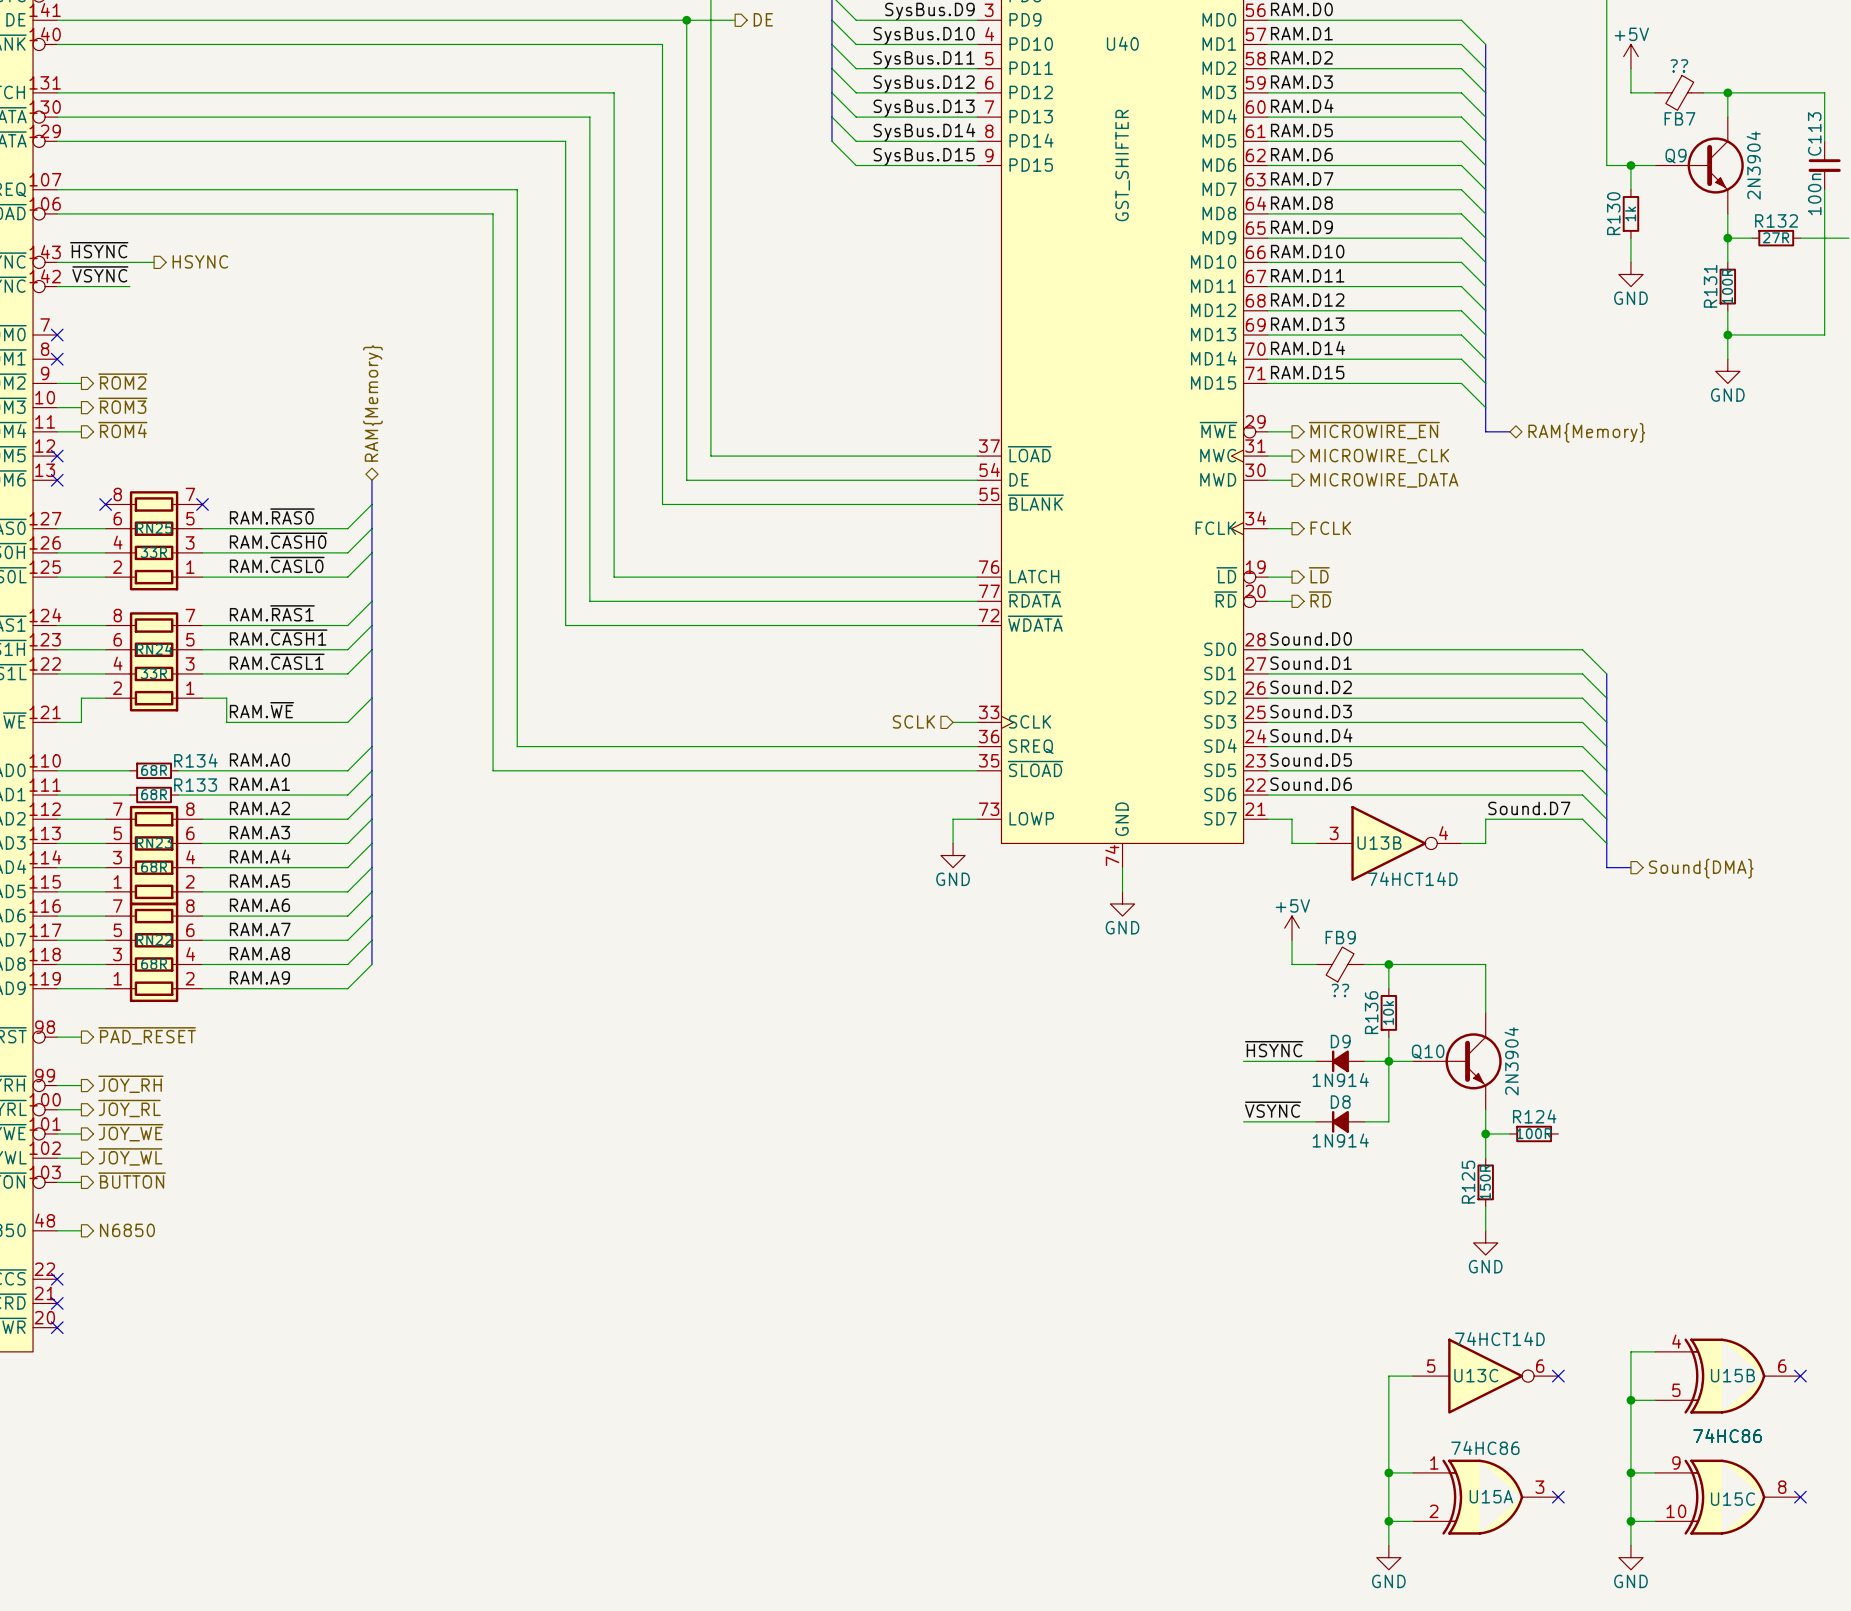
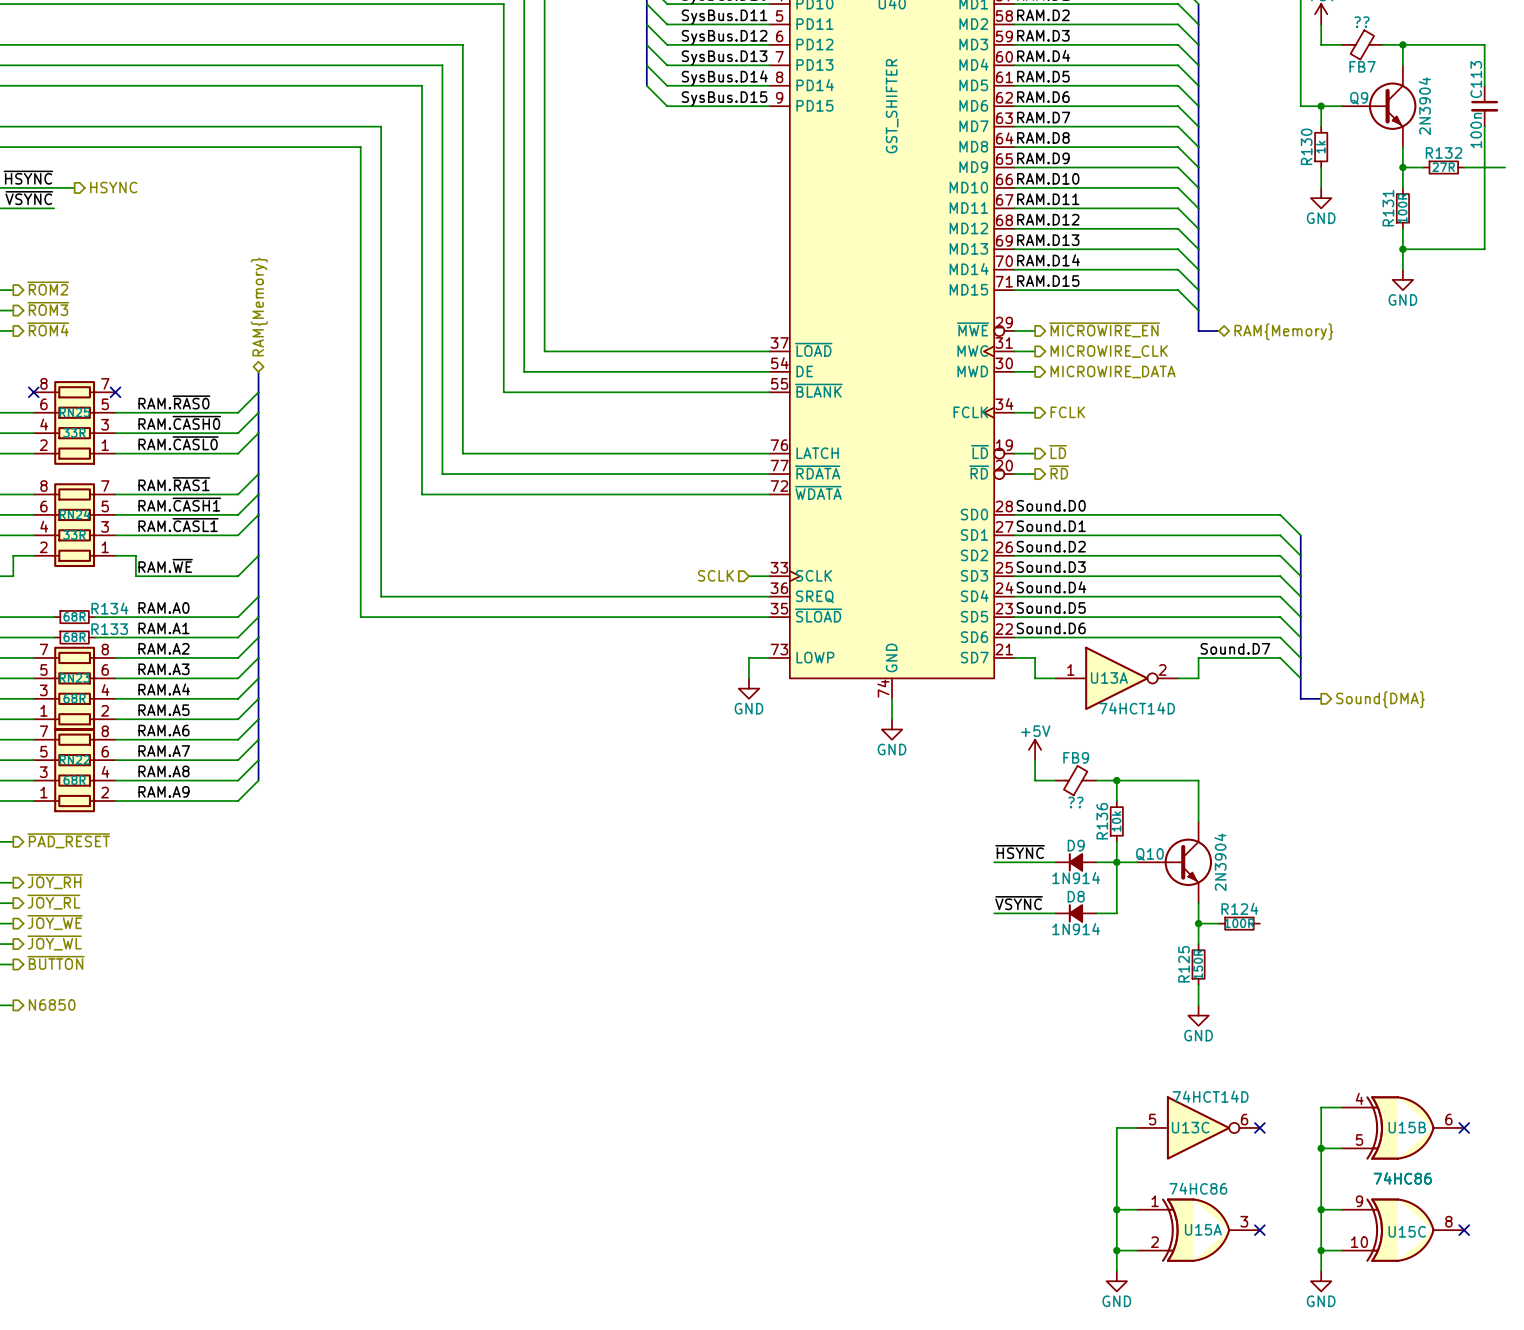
U13B pin number: 3 (1334, 833) -> 1 (1070, 669)
U13B pin number: 4 (1443, 833) -> 2 (1162, 669)
U13B name: U13B (1379, 842) -> U13A (1109, 678)

